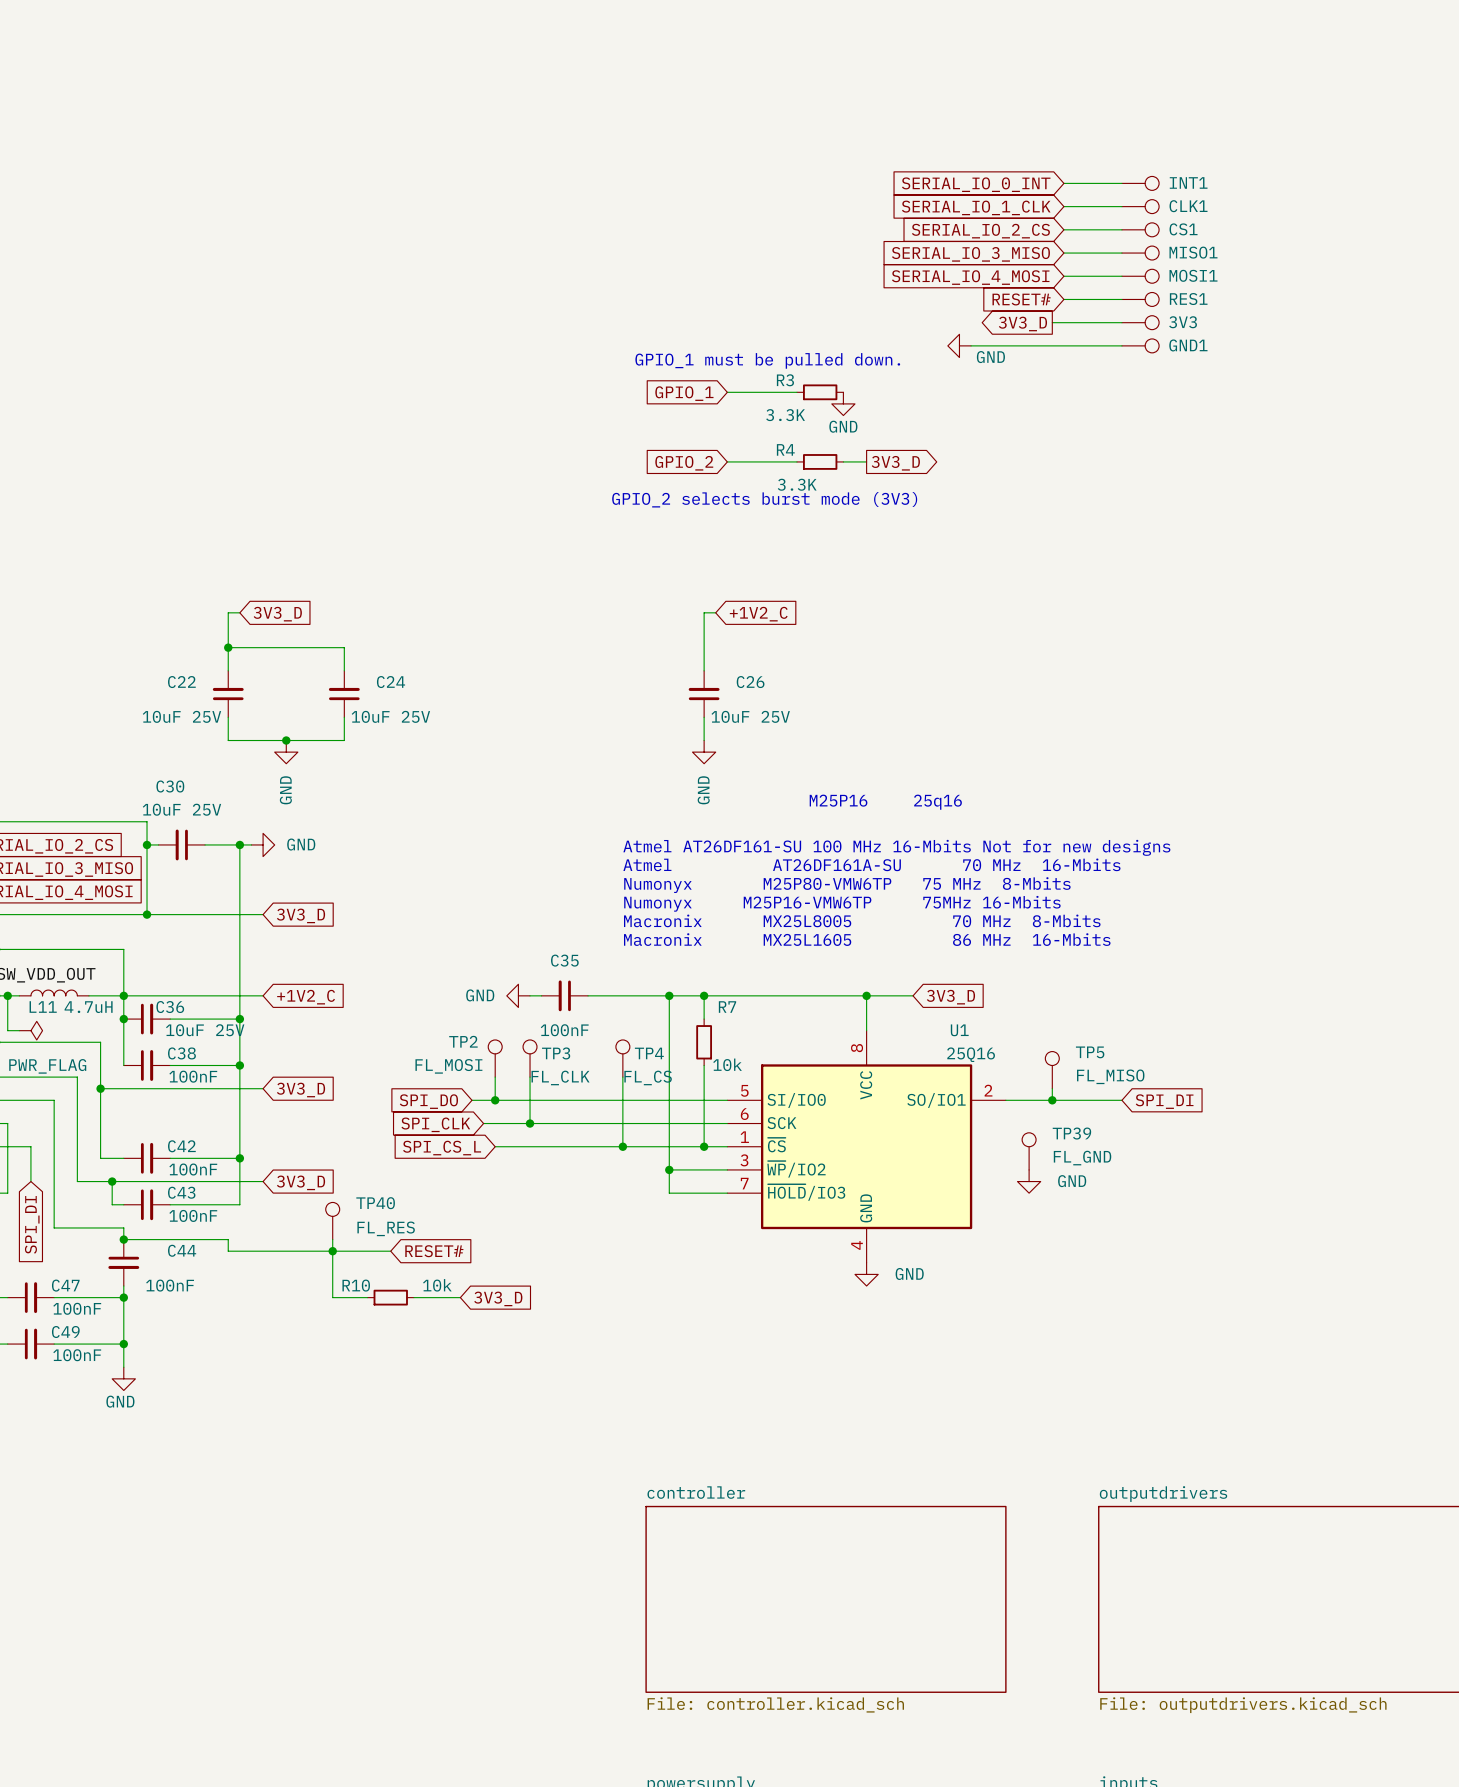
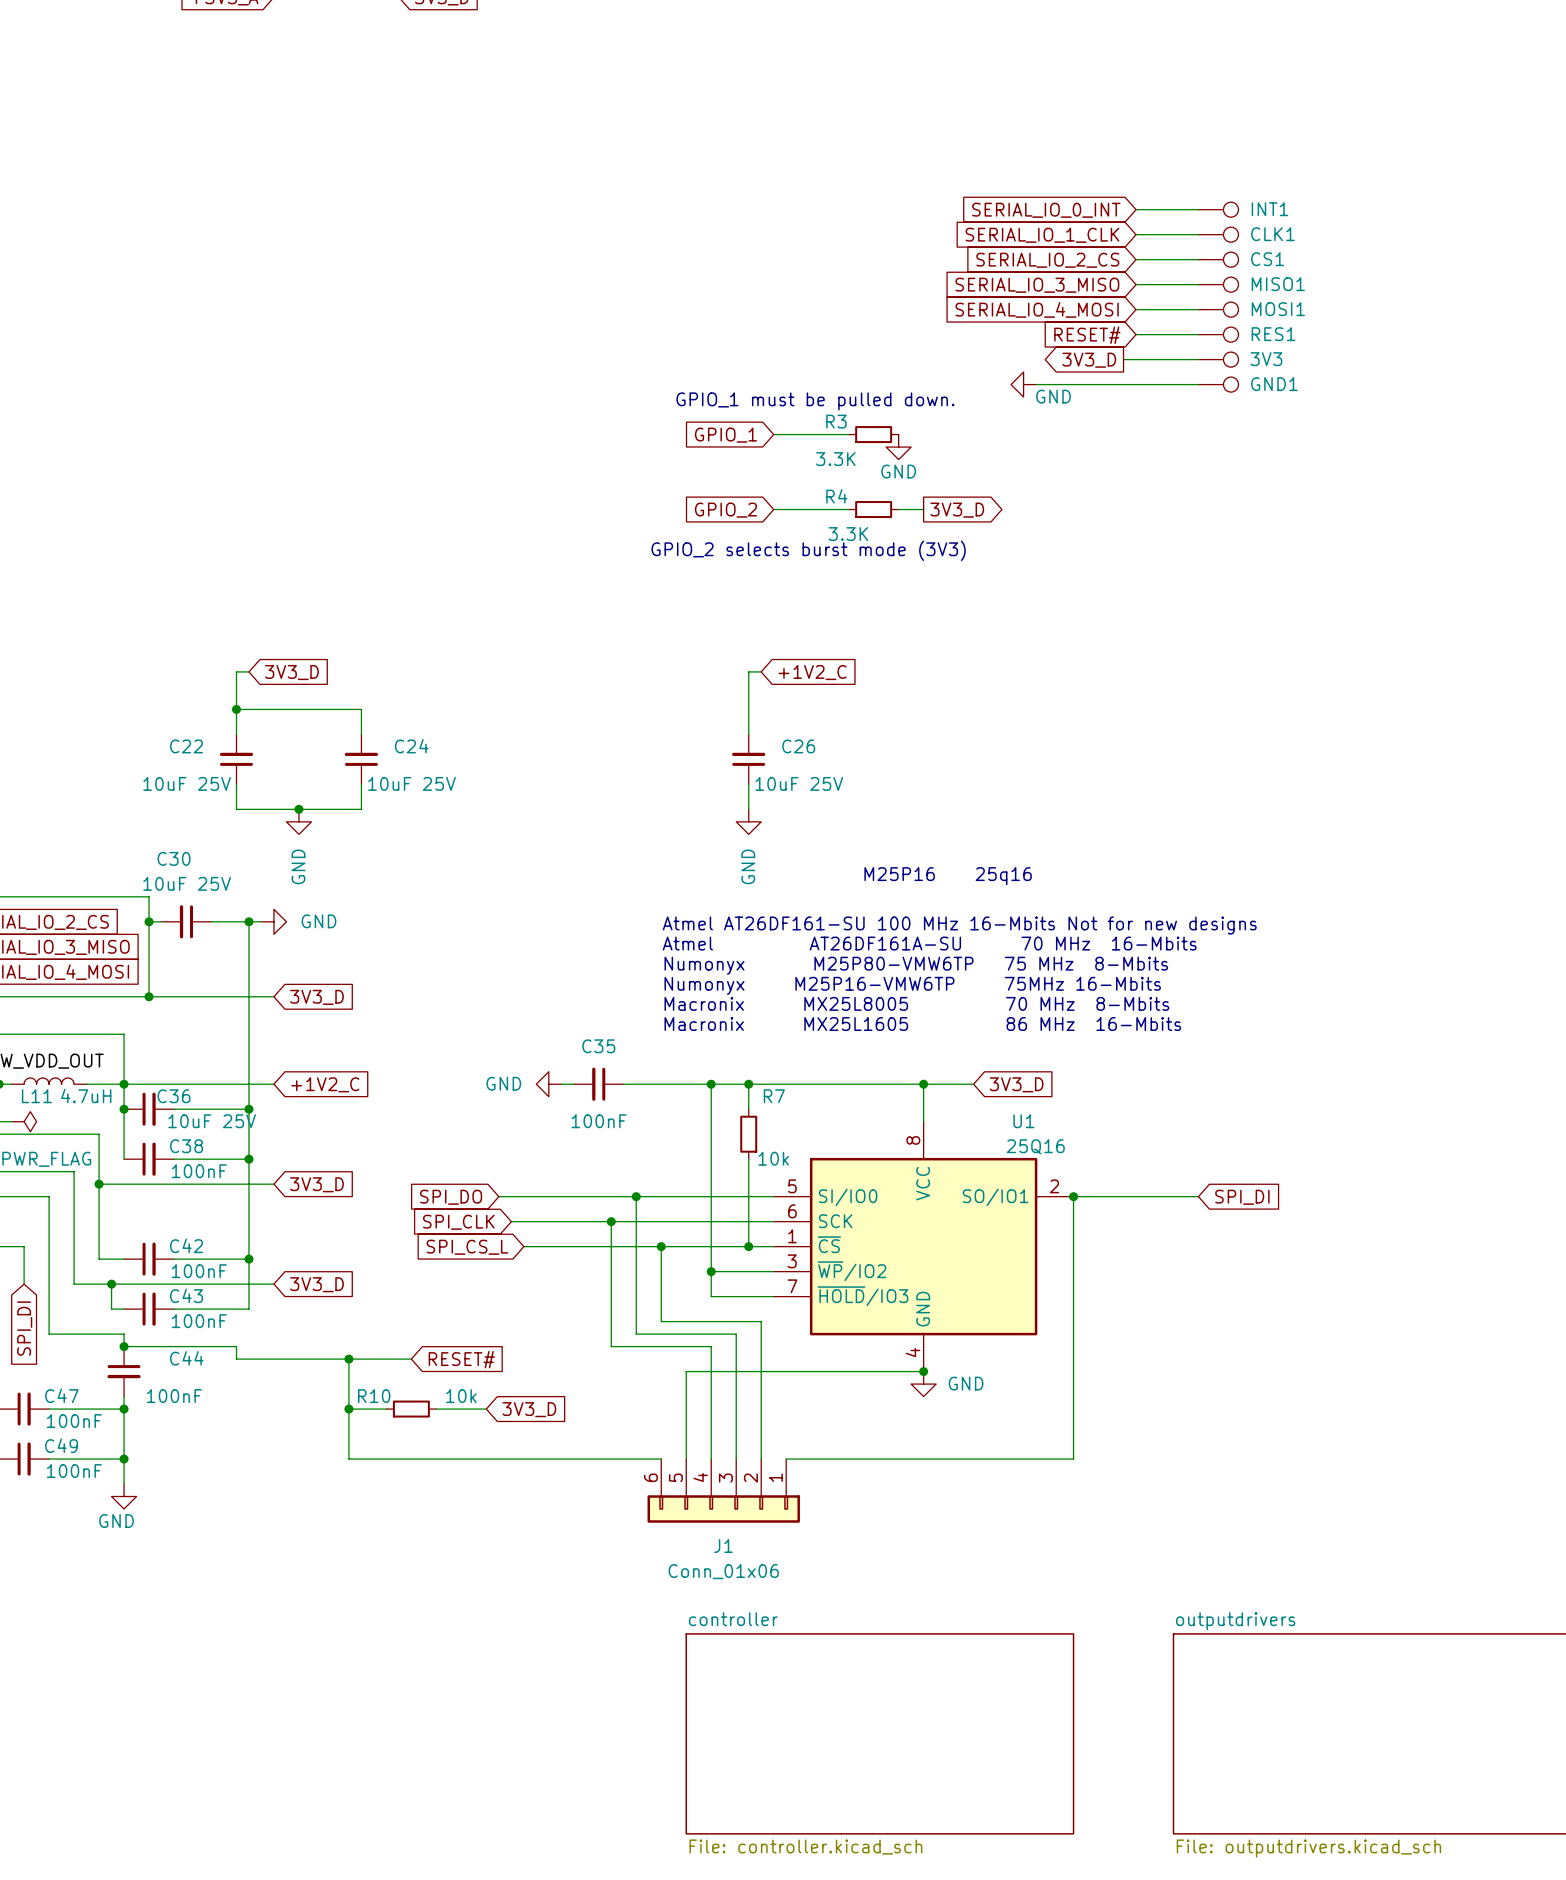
TP2: FL_MOSI (495, 1058) -> none
TP3: FL_CLK (530, 1058) -> none
TP4: FL_CS (622, 1058) -> none
TP5: FL_MISO (1052, 1070) -> none
wire: (495, 1077) (495, 1100) -> none
wire: (530, 1077) (530, 1123) -> none
wire: (622, 1077) (622, 1146) -> (761, 1459) (761, 1321) (661, 1321) (661, 1246)
wire: (1052, 1088) (1052, 1100) -> none
junction: (495, 1100) -> none
wire: none -> (636, 1196) (636, 1334) (736, 1334) (736, 1459)
junction: none -> (636, 1196)
wire: none -> (1073, 1196) (1073, 1459) (786, 1459)
junction position: (1052, 1100) -> (1073, 1196)
junction: (530, 1123) -> none
wire: none -> (611, 1221) (611, 1346) (711, 1346) (711, 1459)
junction: none -> (611, 1221)
TP39: FL_GND (1029, 1151) -> none
power symbol: GND (1029, 1181) -> none
TP40: FL_RES (332, 1221) -> none
wire: (332, 1239) (332, 1251) -> none
wire: none -> (923, 1371) (686, 1371) (686, 1459)
junction: none -> (923, 1371)
wire: none -> (348, 1409) (348, 1459) (661, 1459)
junction: none -> (348, 1409)
J1: none -> Conn_01x06 (723, 1490)

